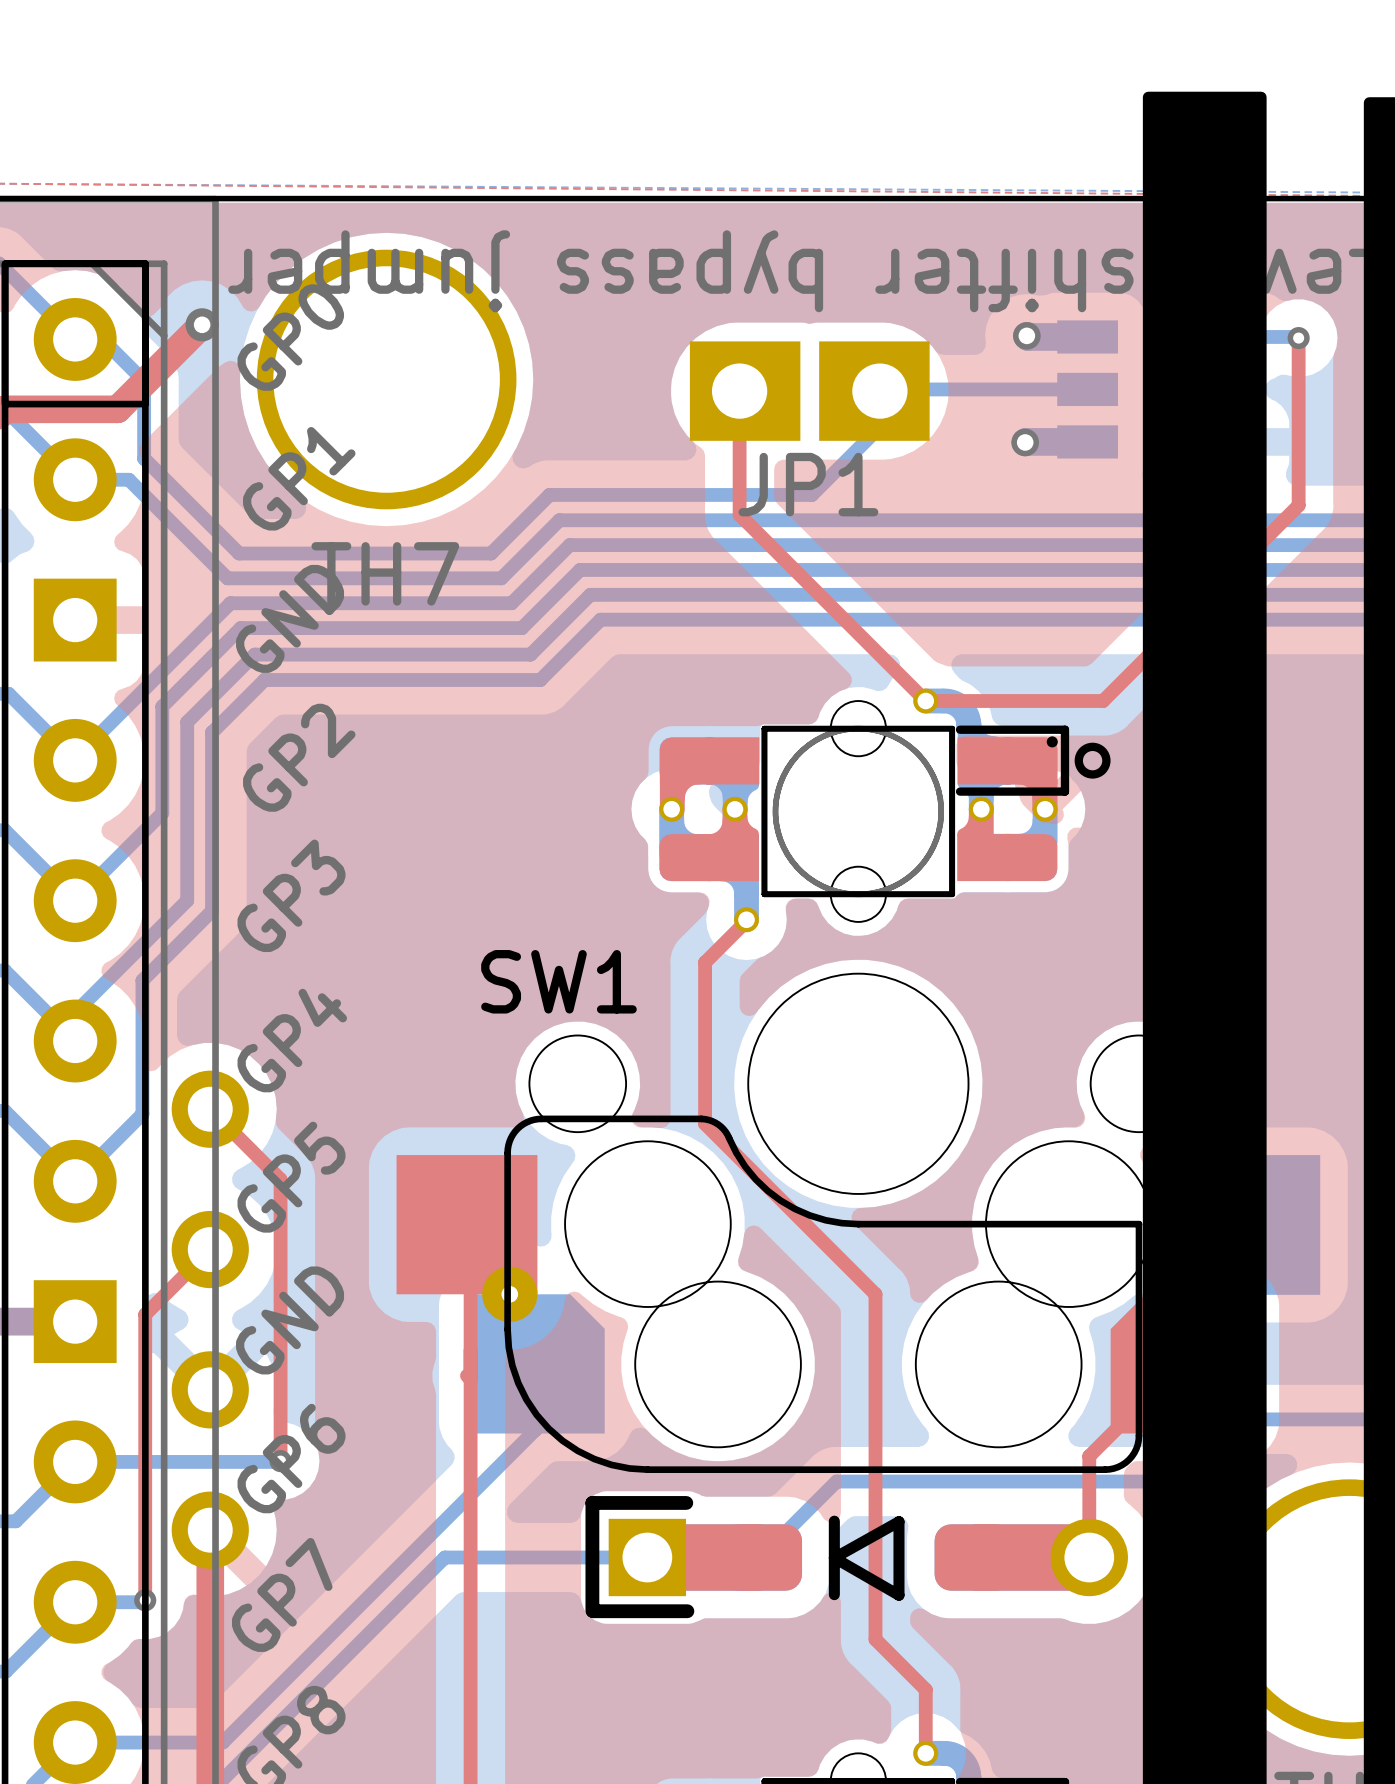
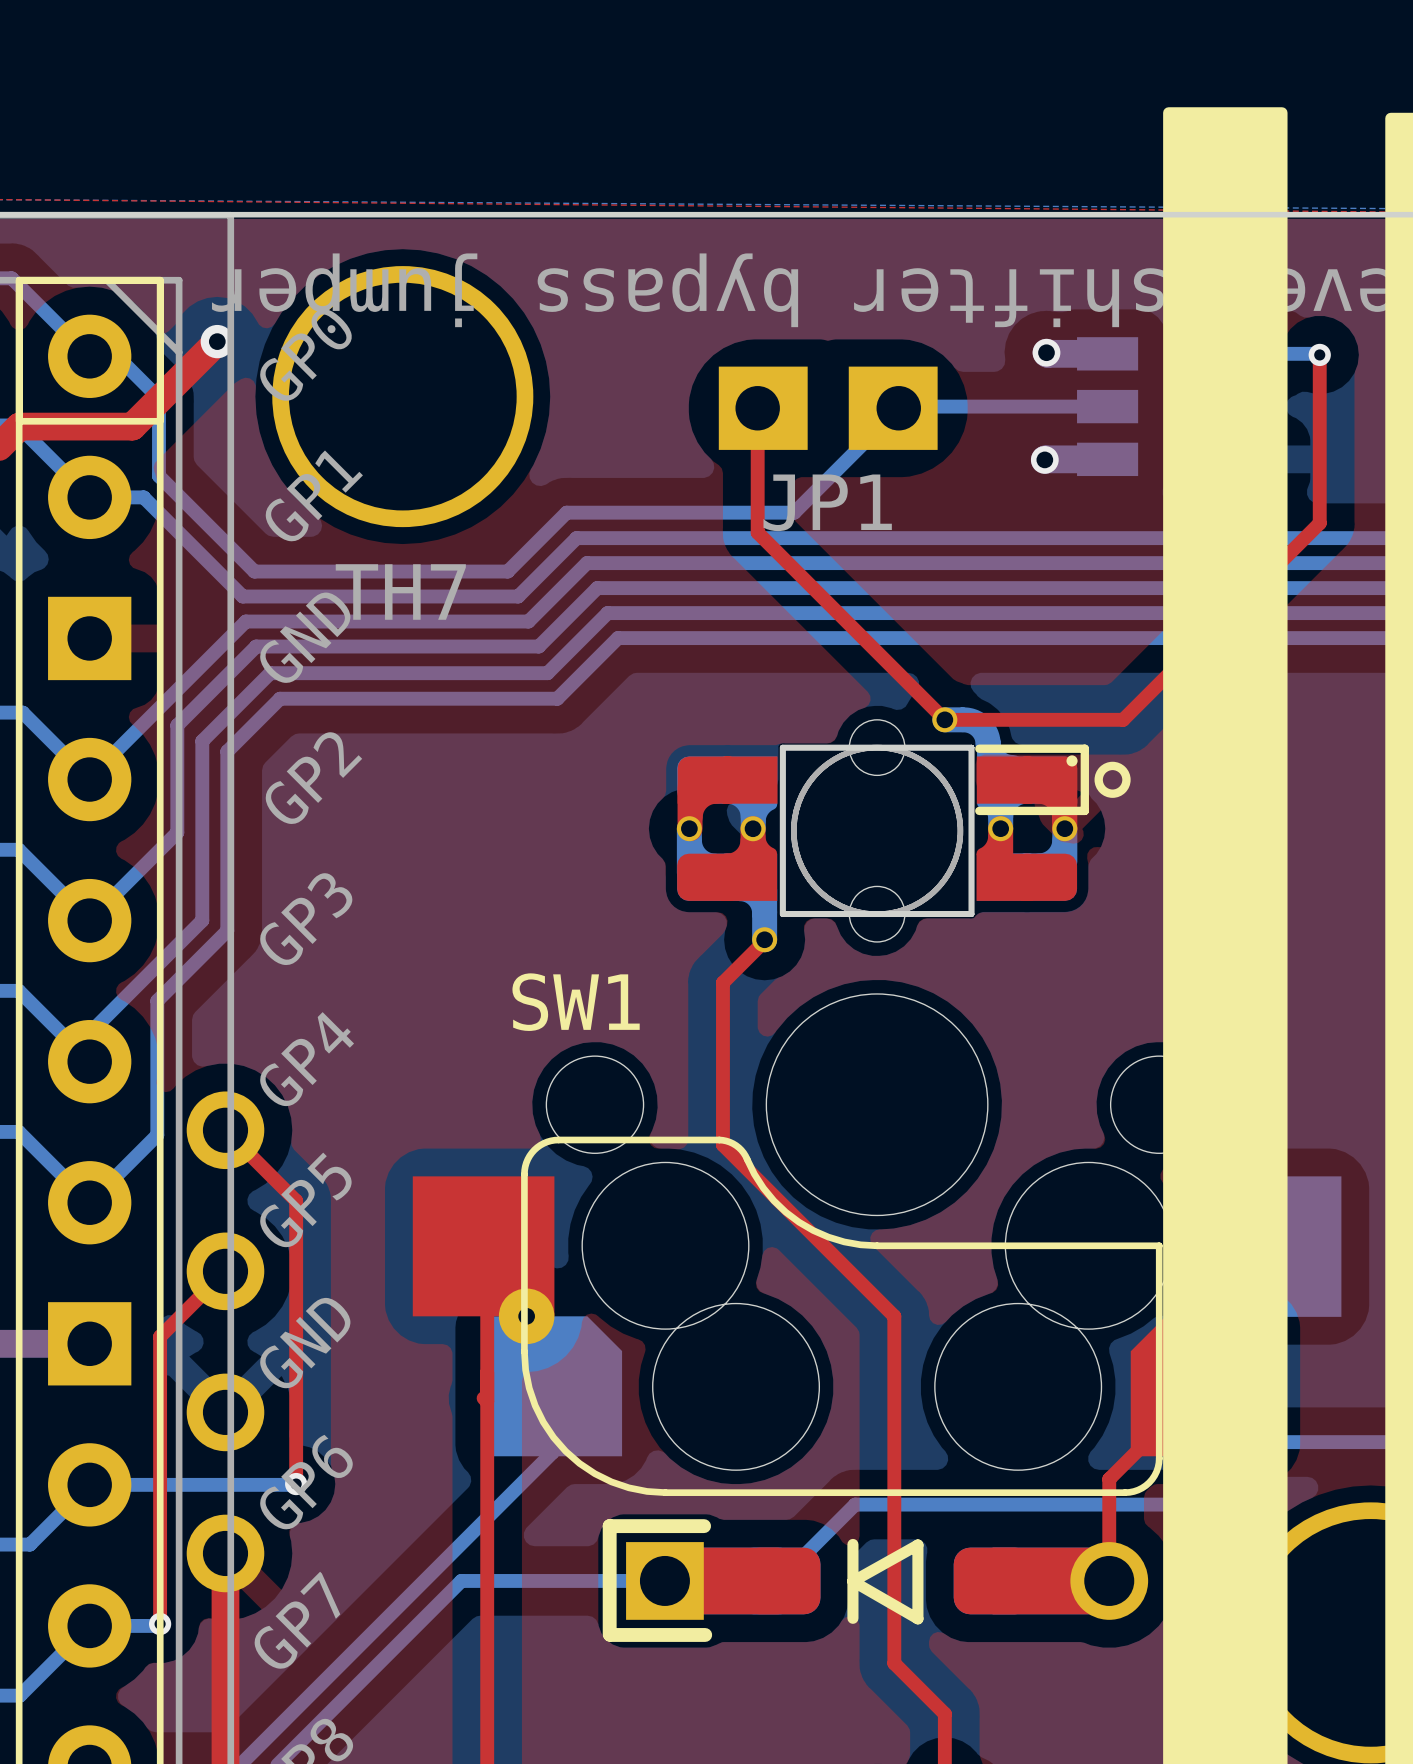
JP1 footprint: [689, 341, 930, 441] -> [718, 366, 938, 450]
bottom track: (879, 427) (811, 494) (776, 494) -> (898, 408) (794, 512)

